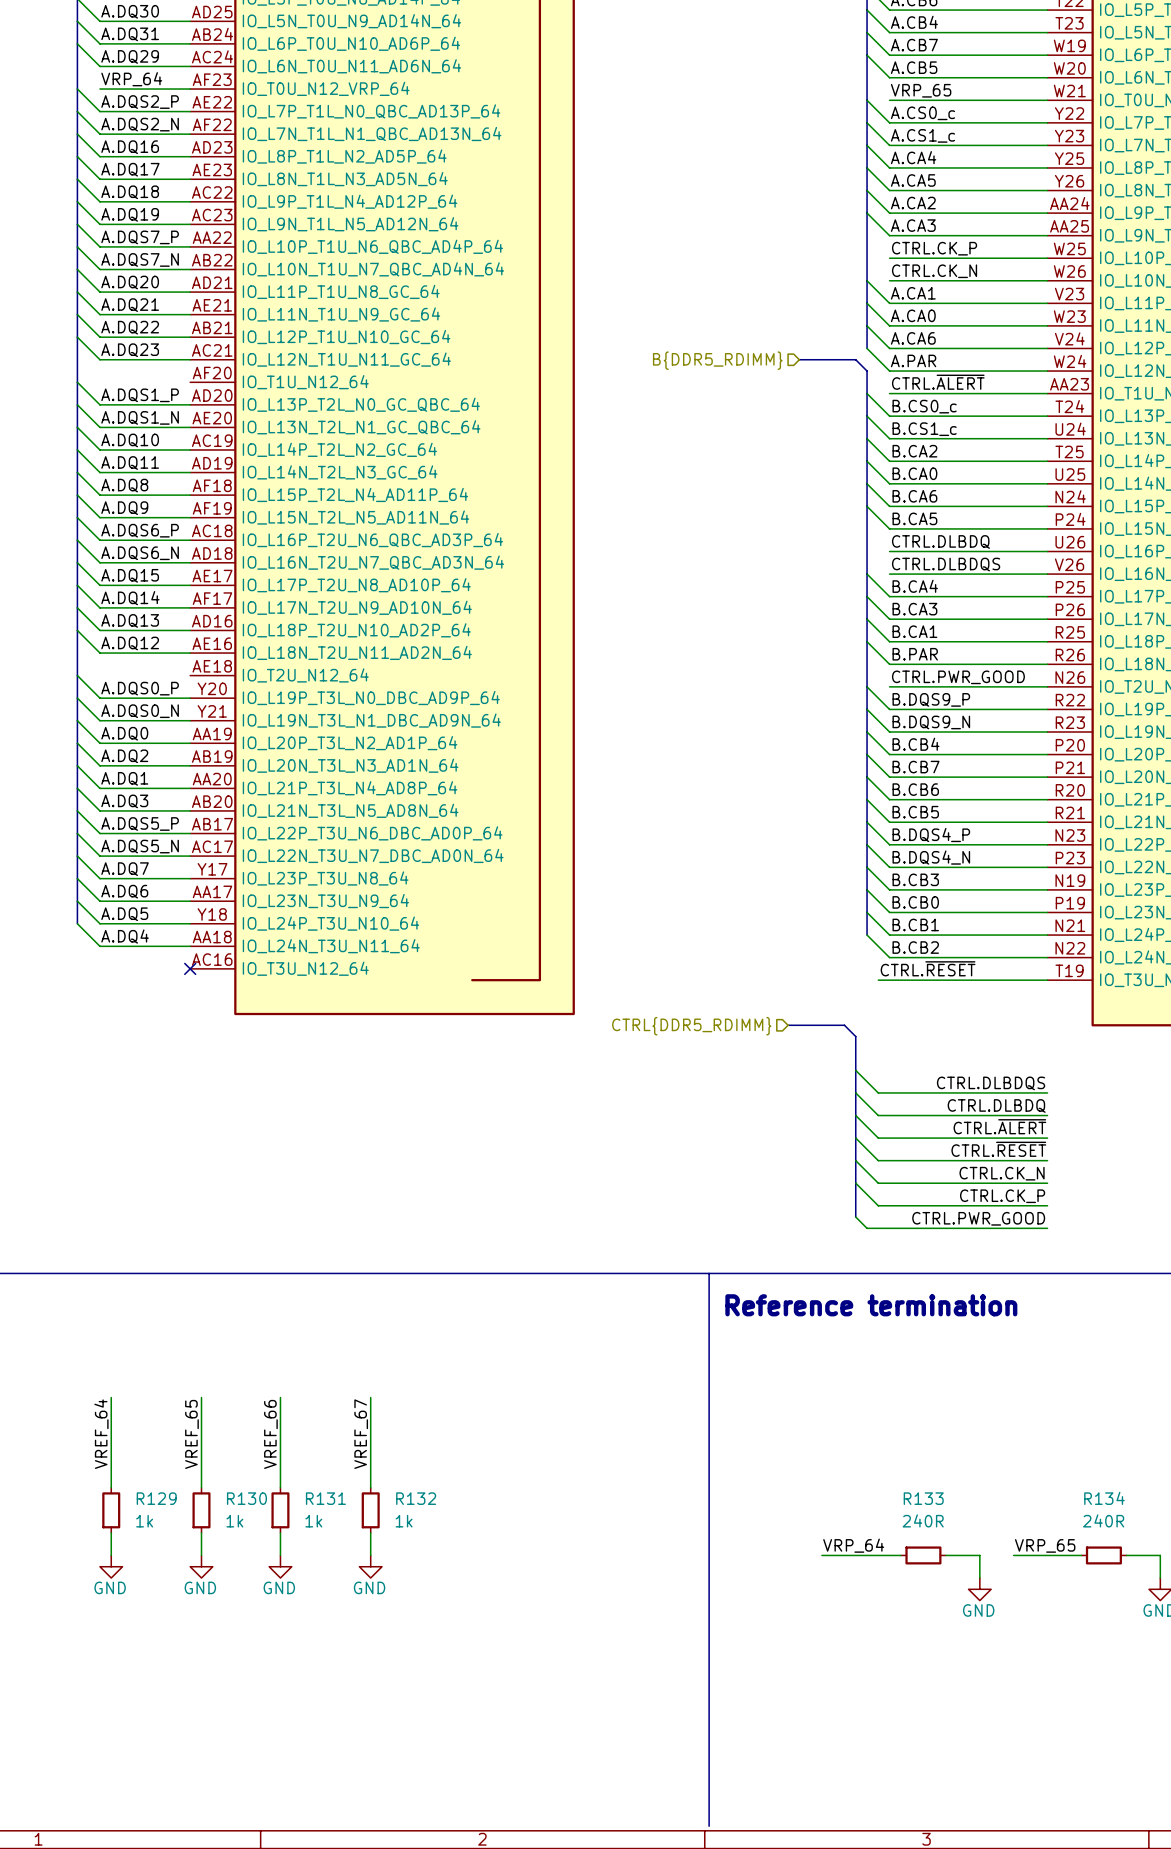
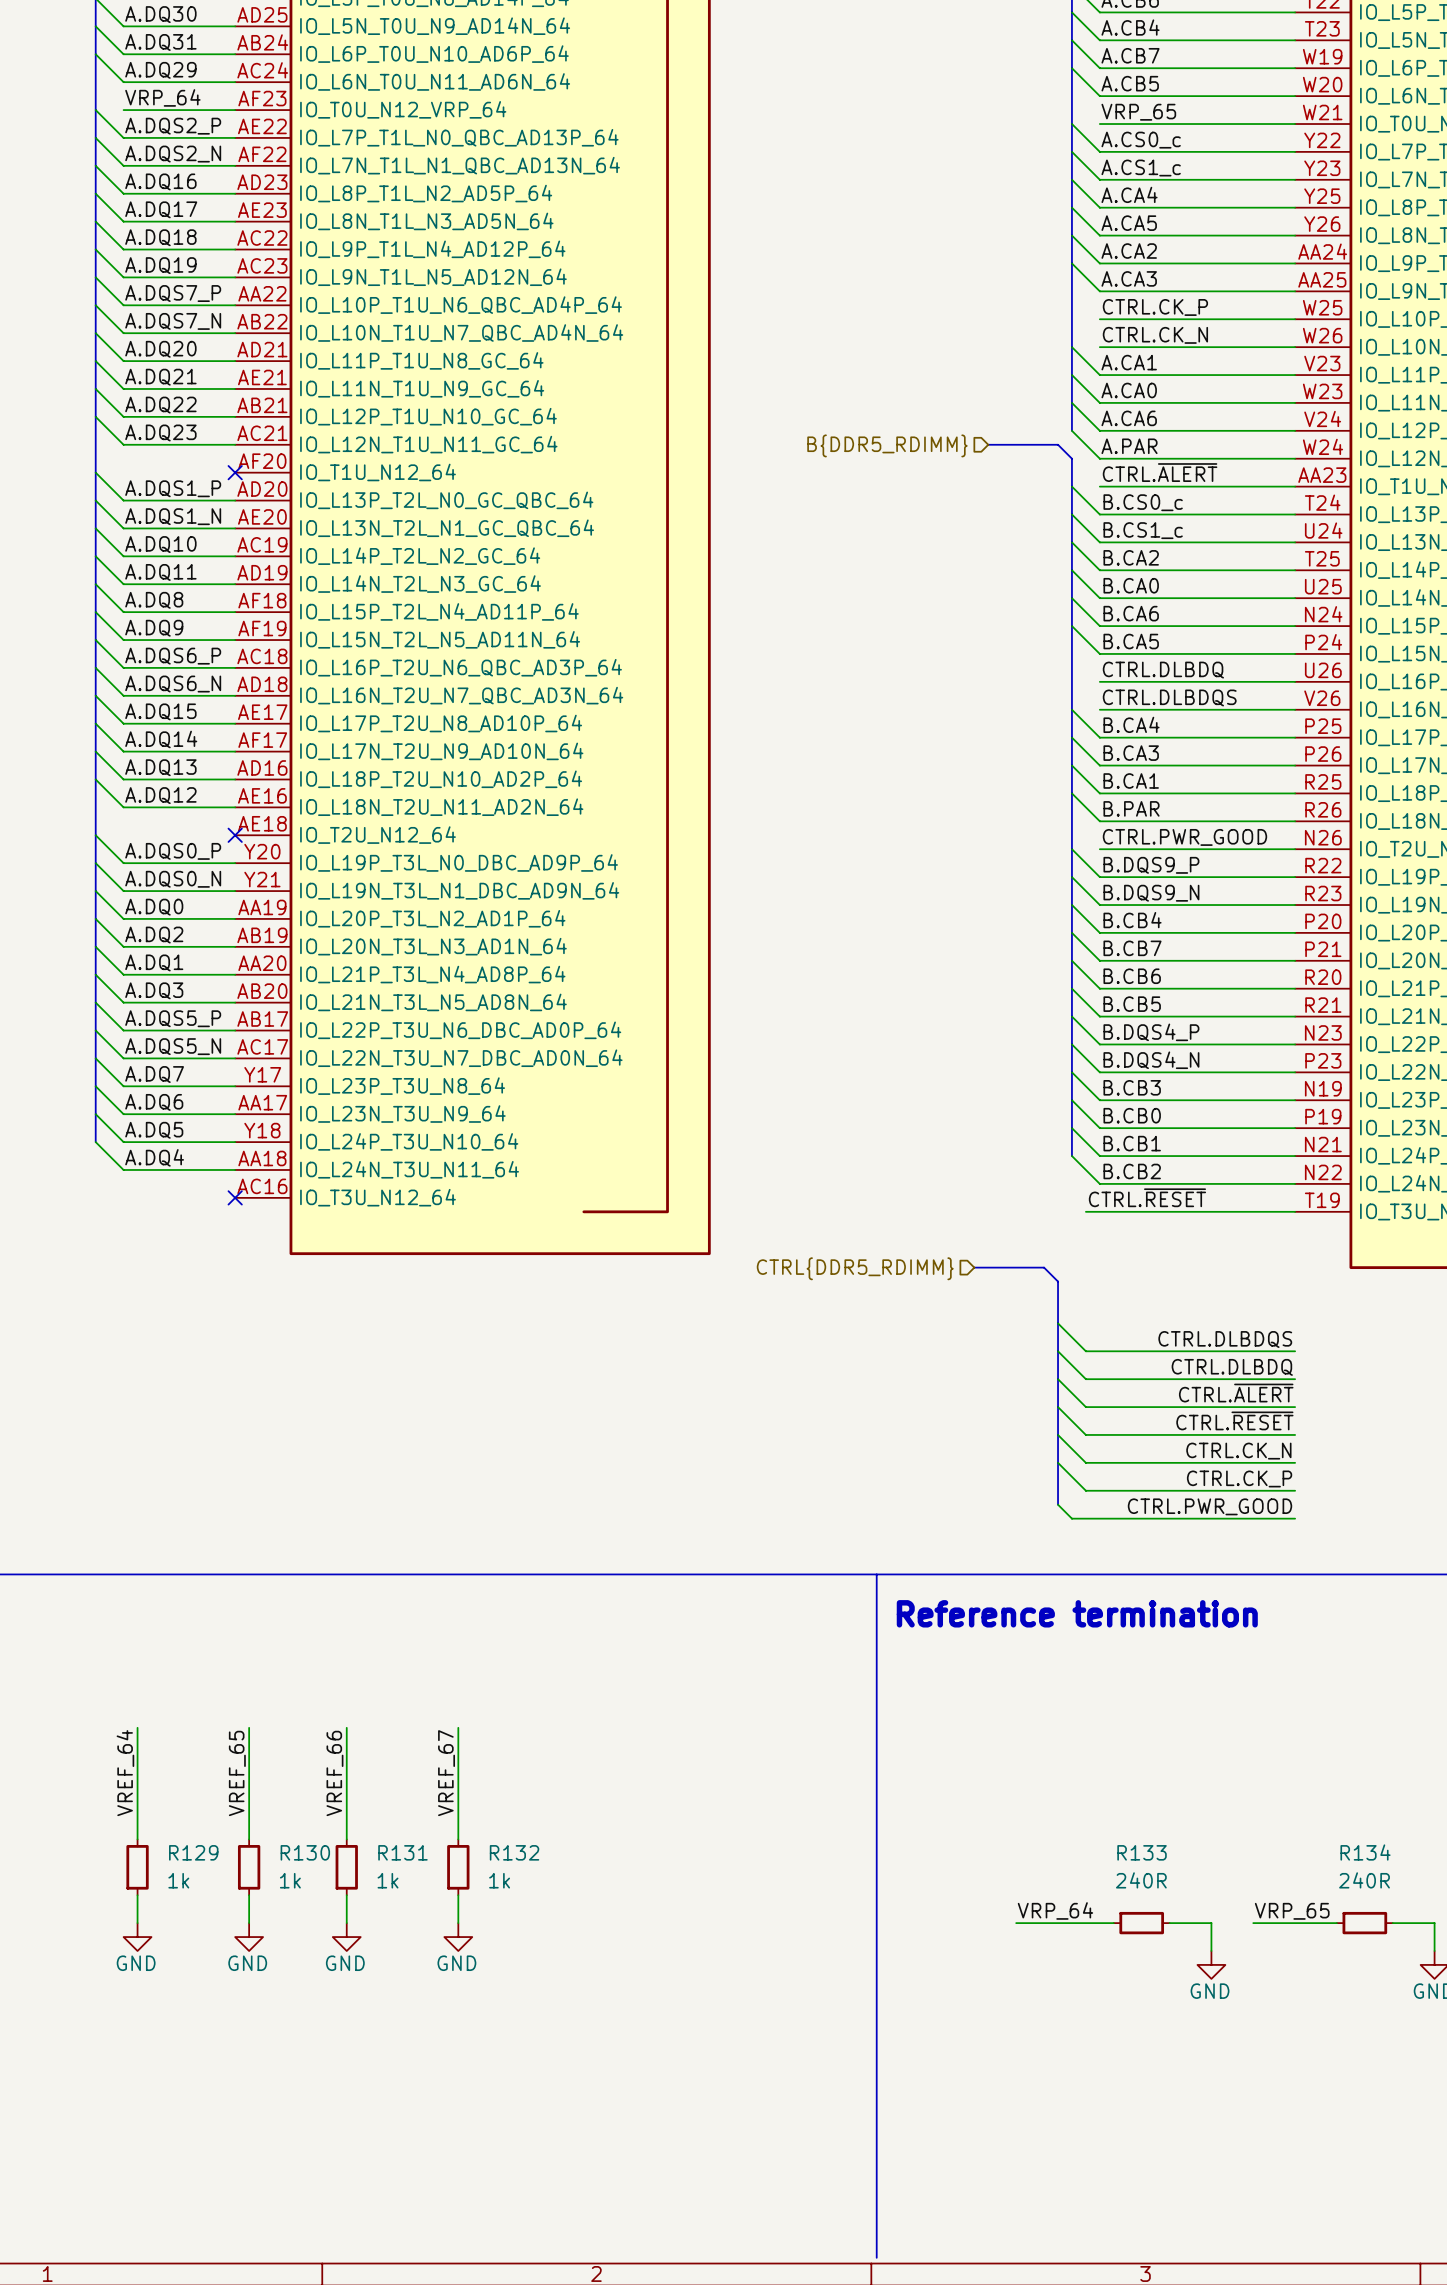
no-connect mark: none -> (235, 472)
no-connect mark: none -> (235, 835)

